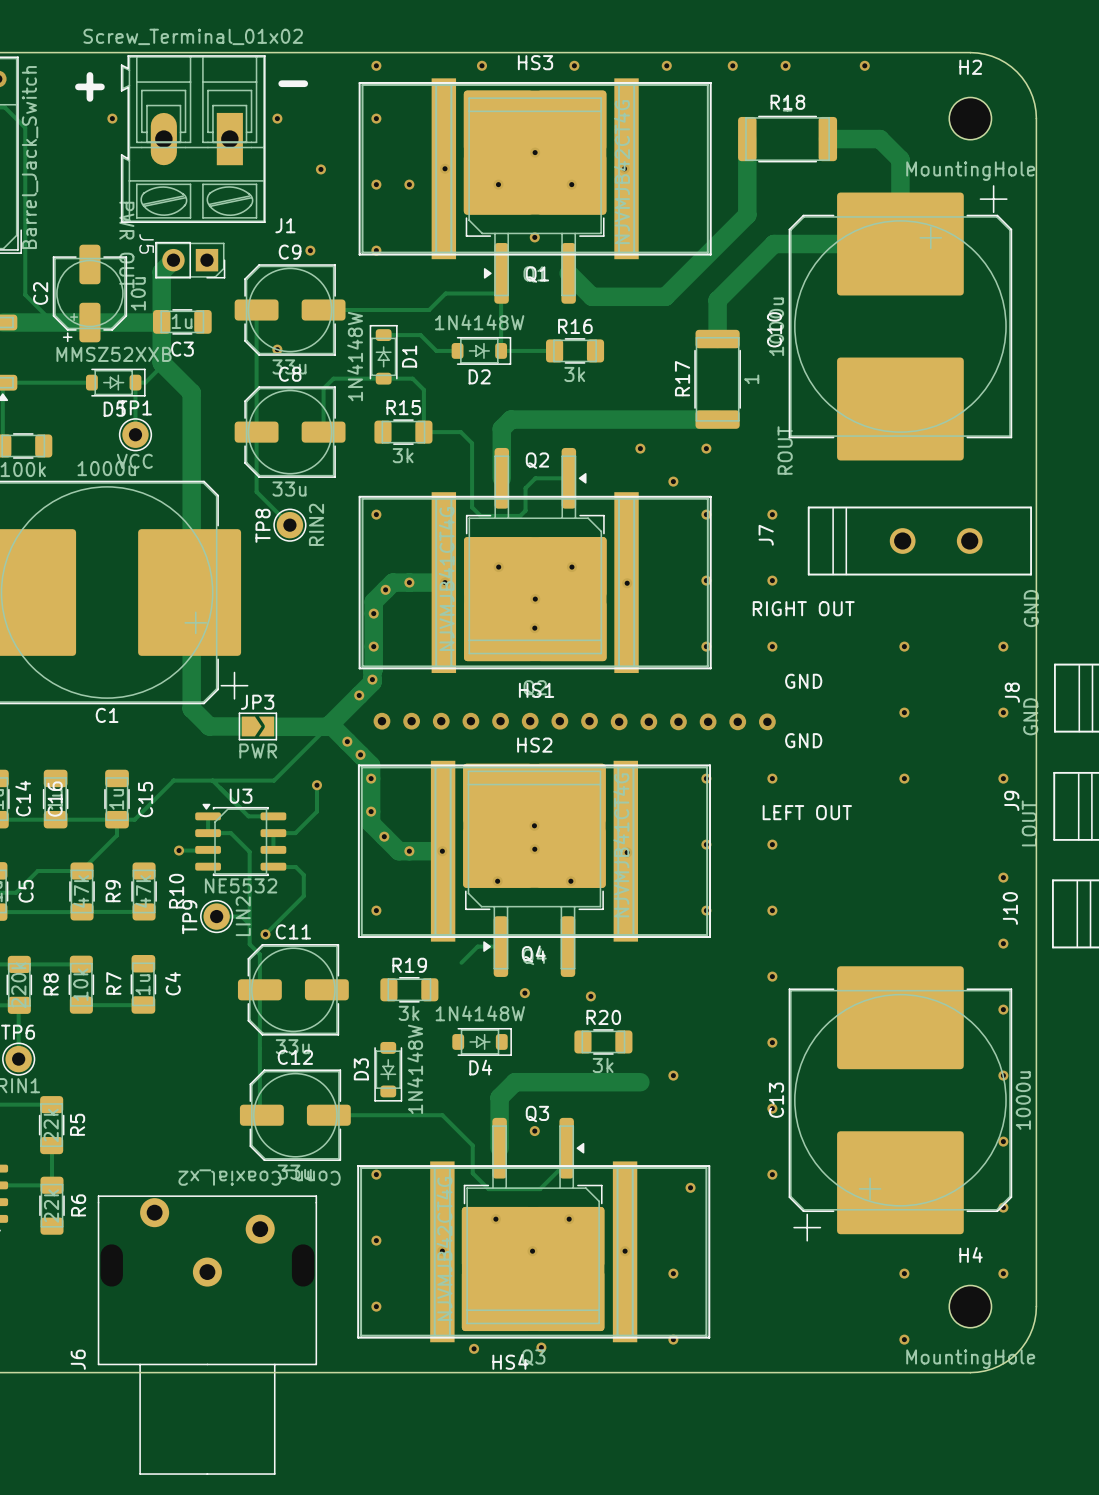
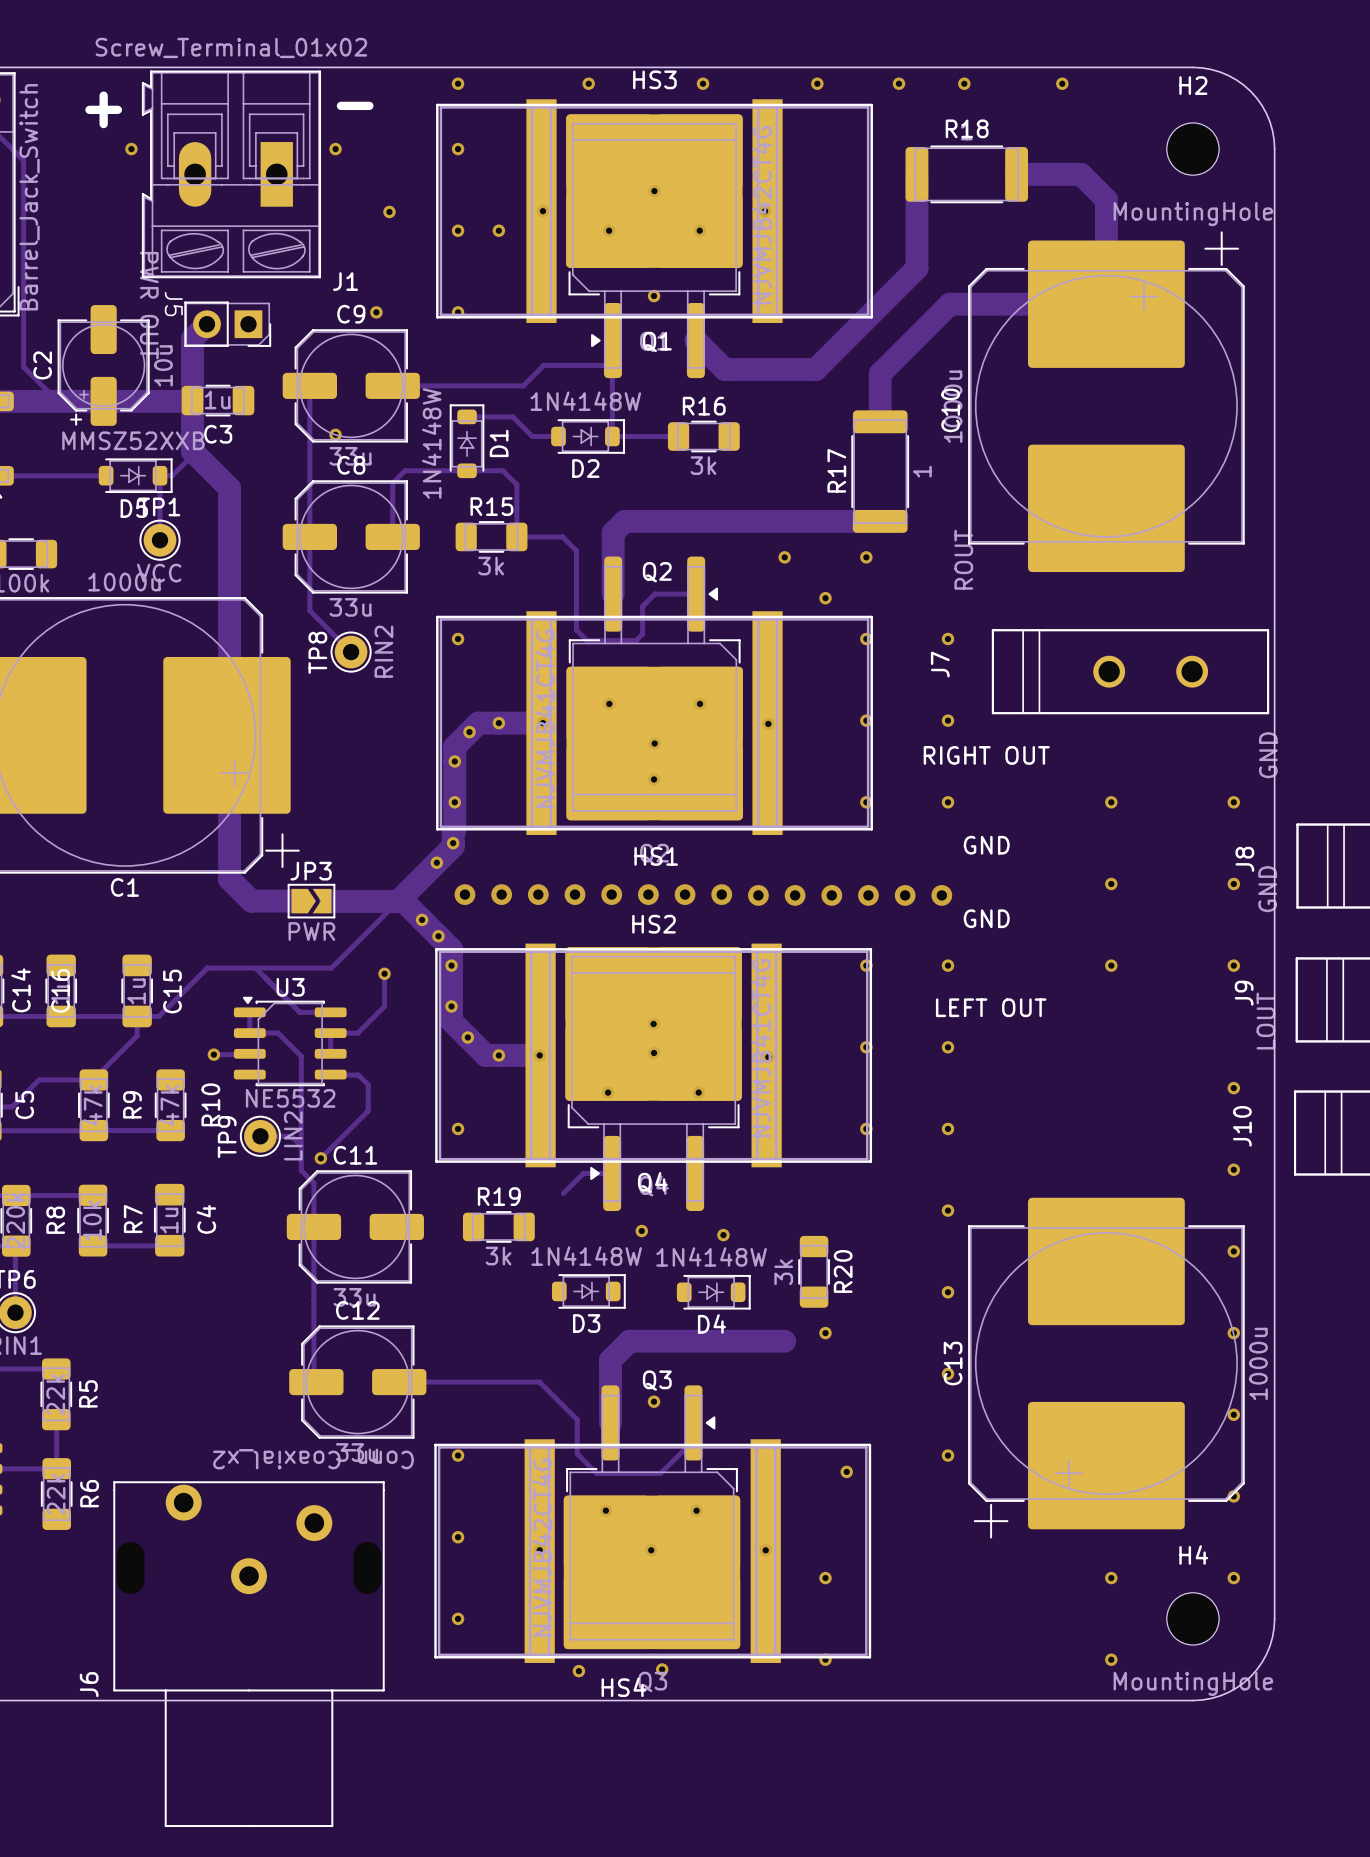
R20 rotation: 0° (603, 1041) -> 90° clockwise (814, 1271)
R20 position: (603, 1041) -> (814, 1271)
D4: none -> 1N4148W (713, 1292)
D4 name: D4 (480, 1067) -> D3 (586, 1323)
D3: 1N4148W (388, 1071) -> none

